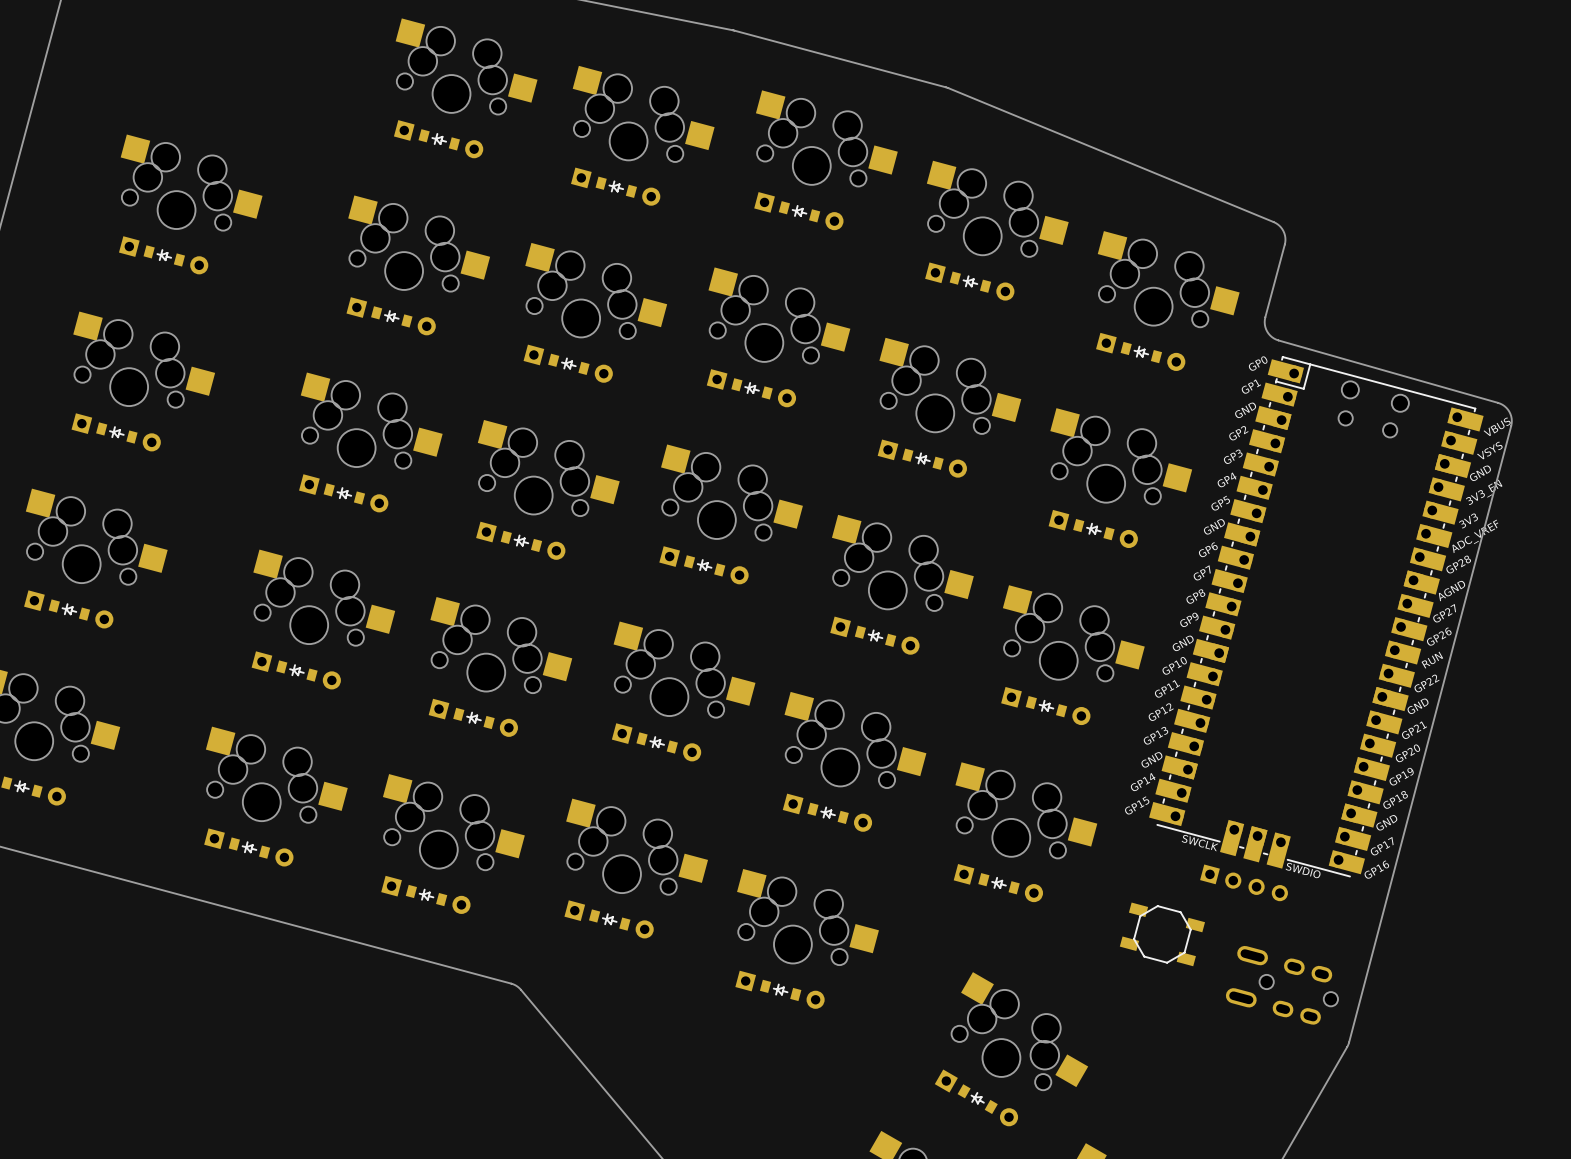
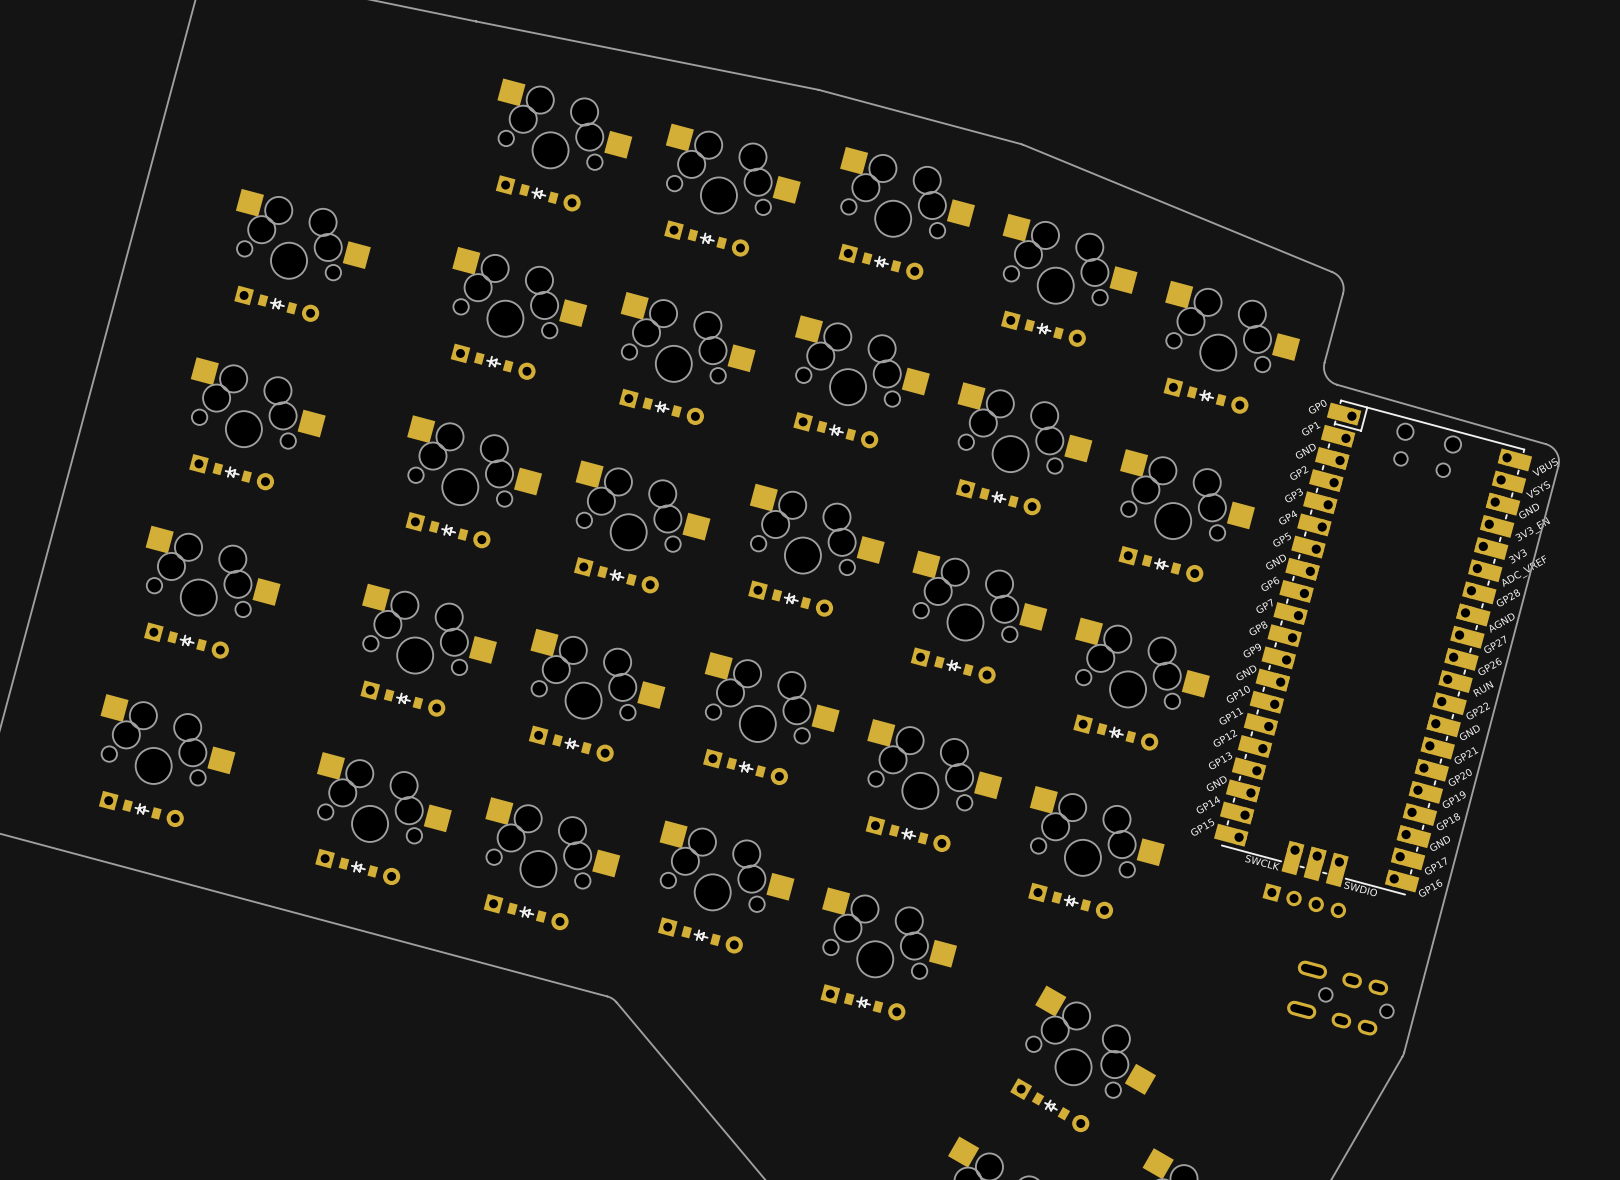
part: (1162, 934) -> none

